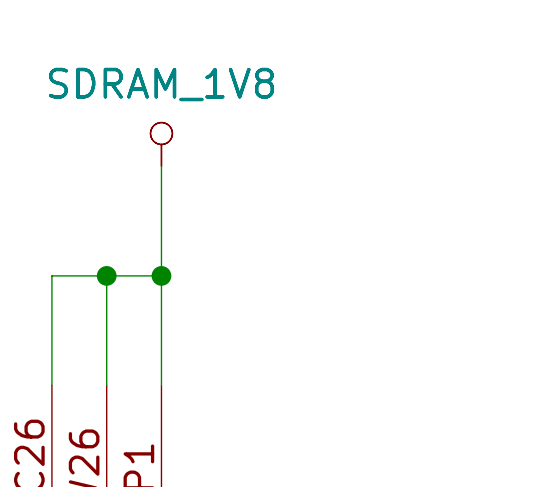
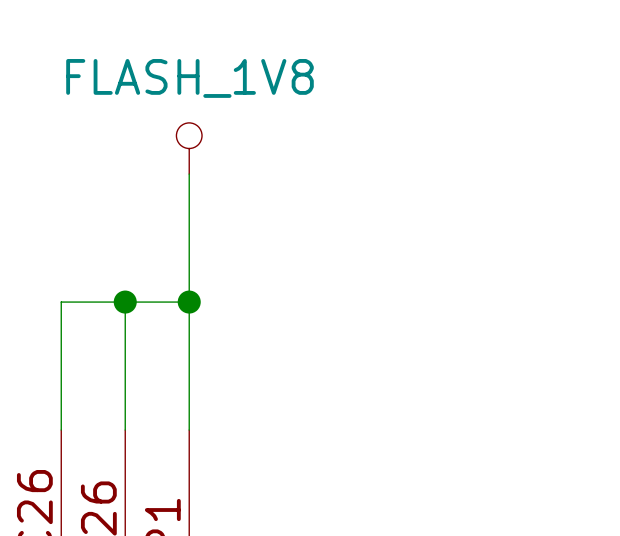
power symbol: SDRAM_1V8 (161, 144) -> FLASH_1V8 (189, 148)

